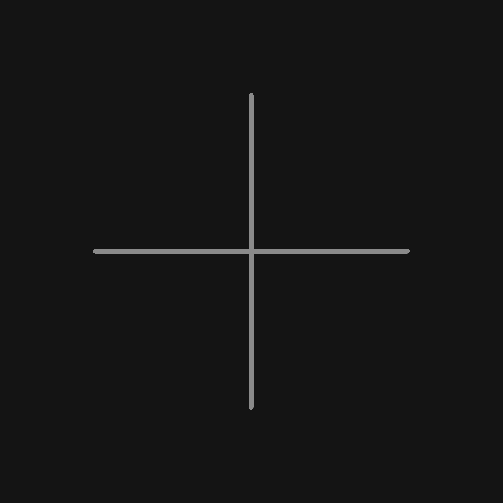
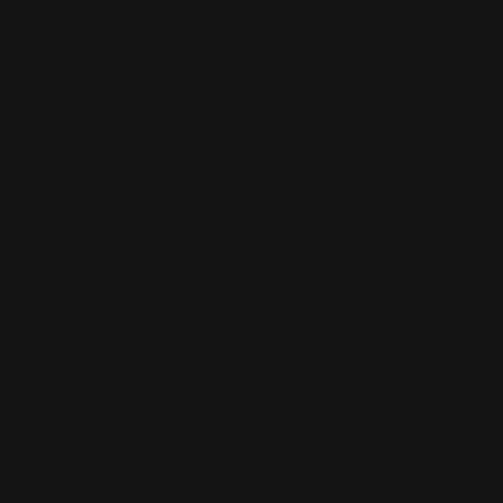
line: (251, 95) (251, 407) -> none
line: (95, 251) (407, 251) -> none

